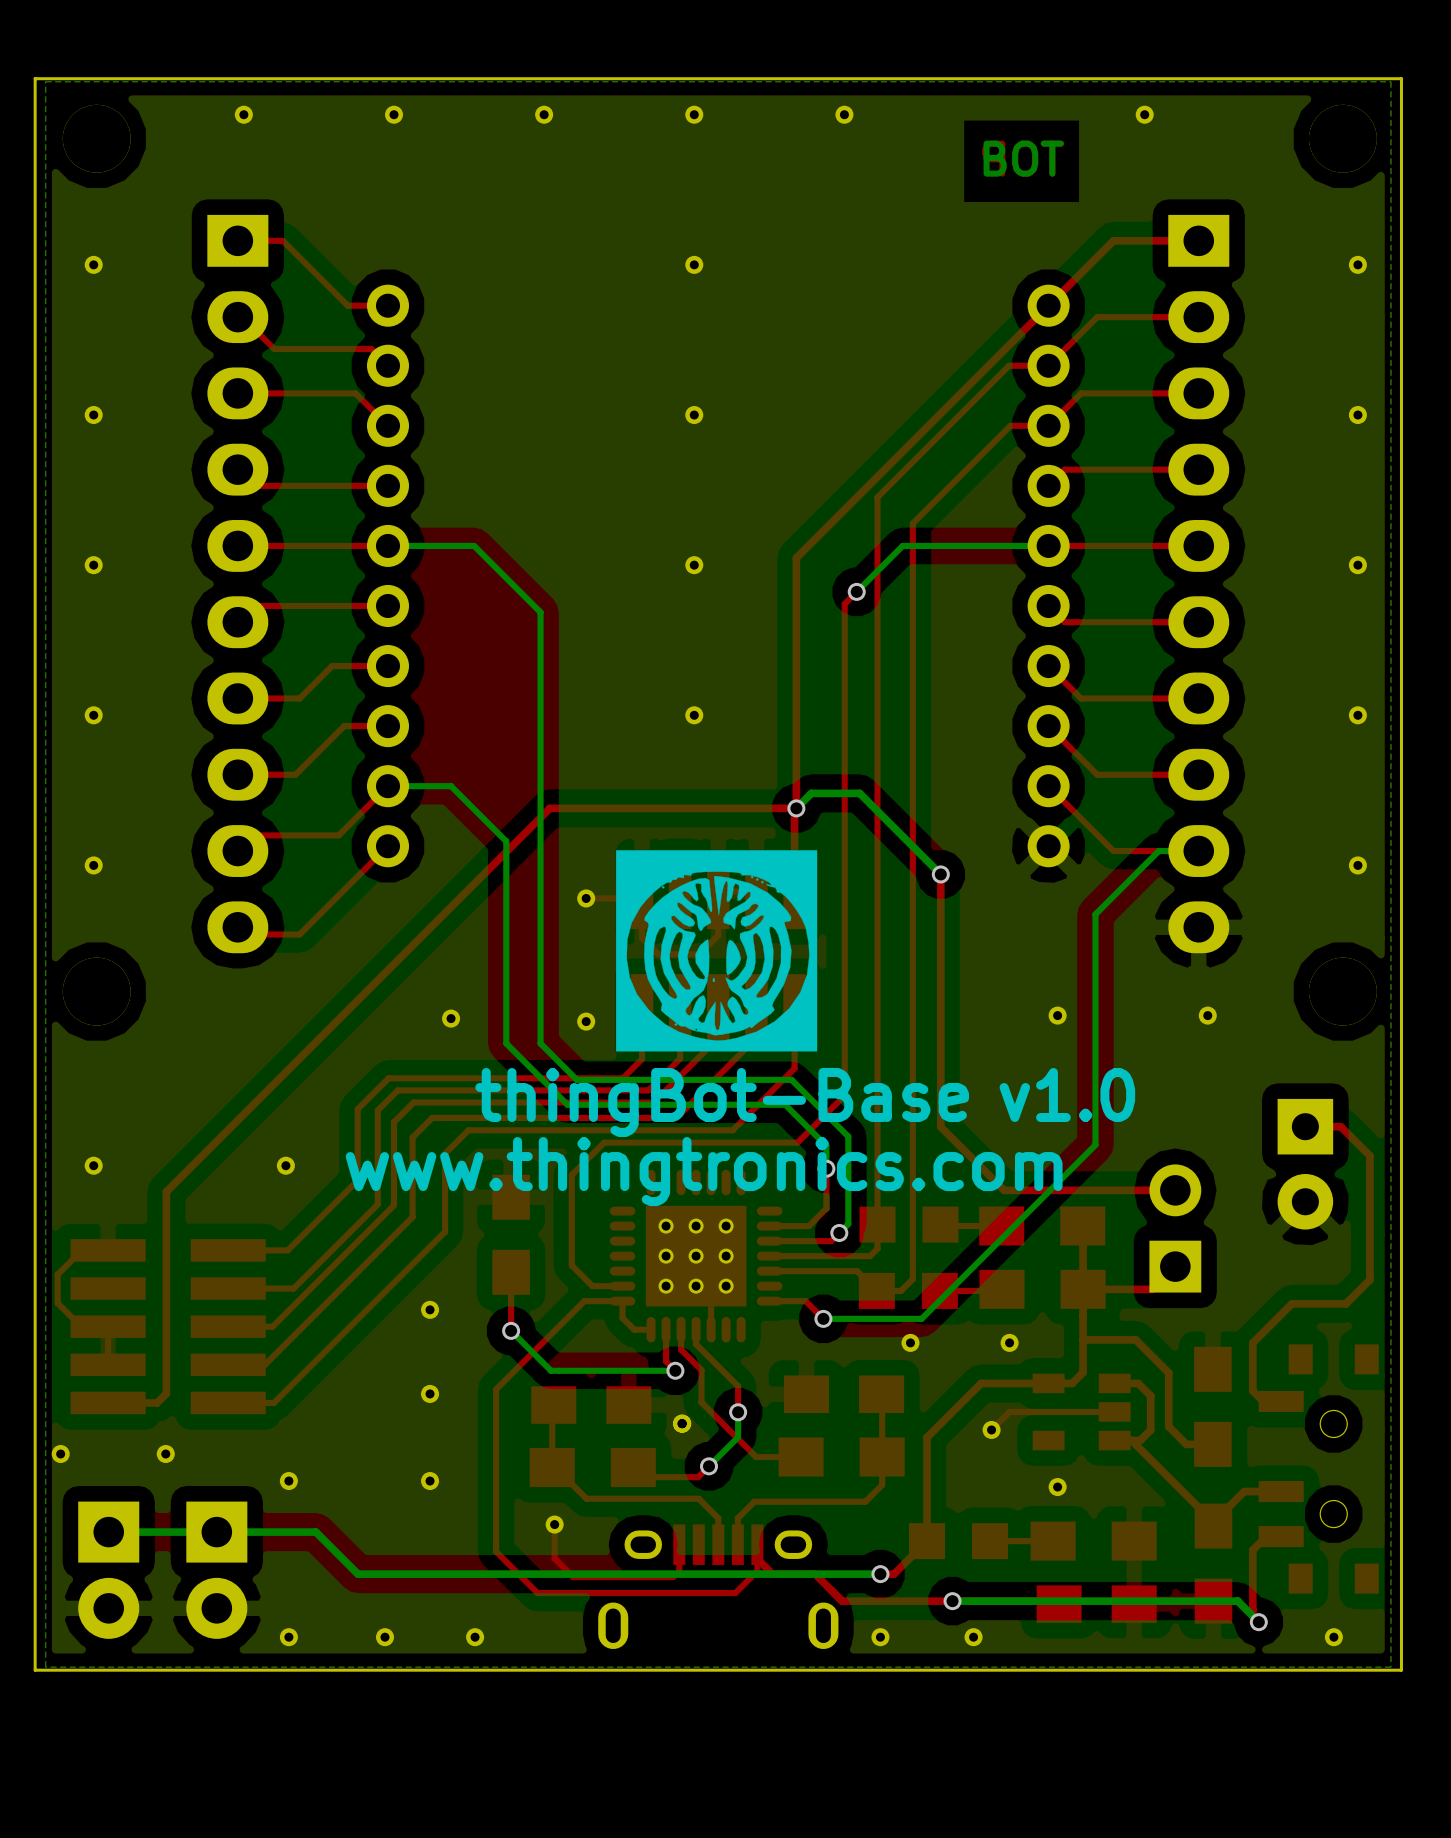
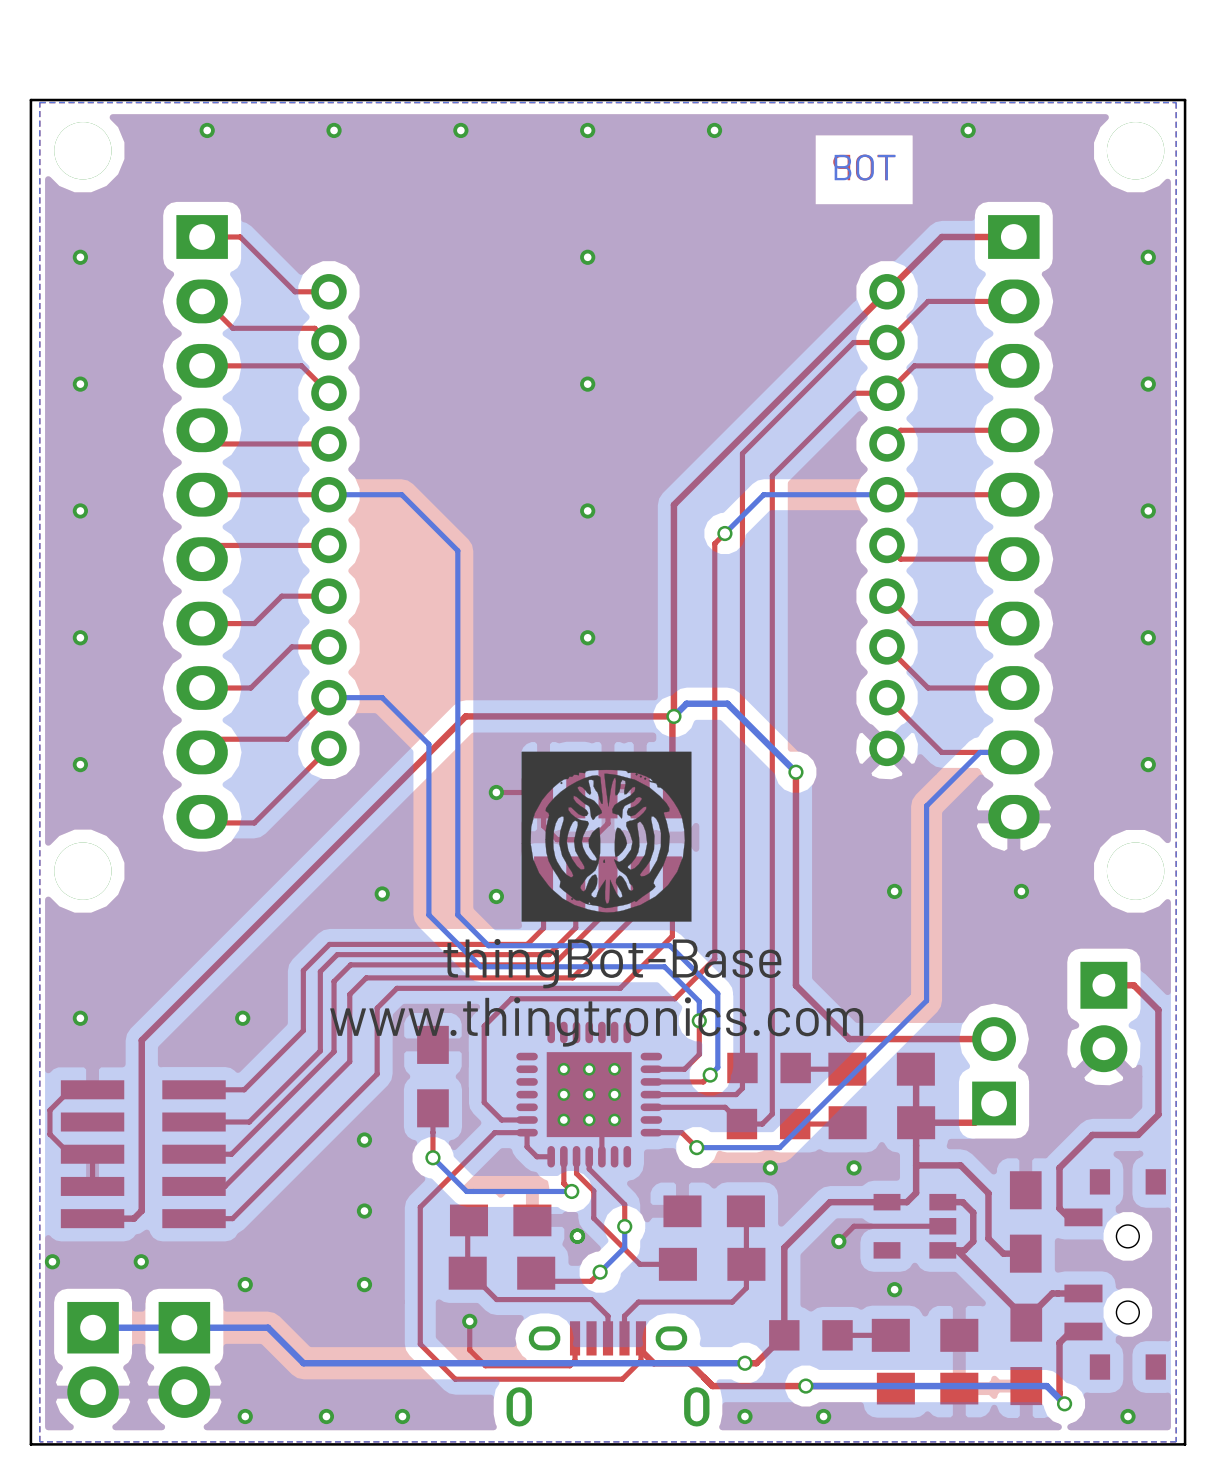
text: v1.0 (1067, 1094) -> none

